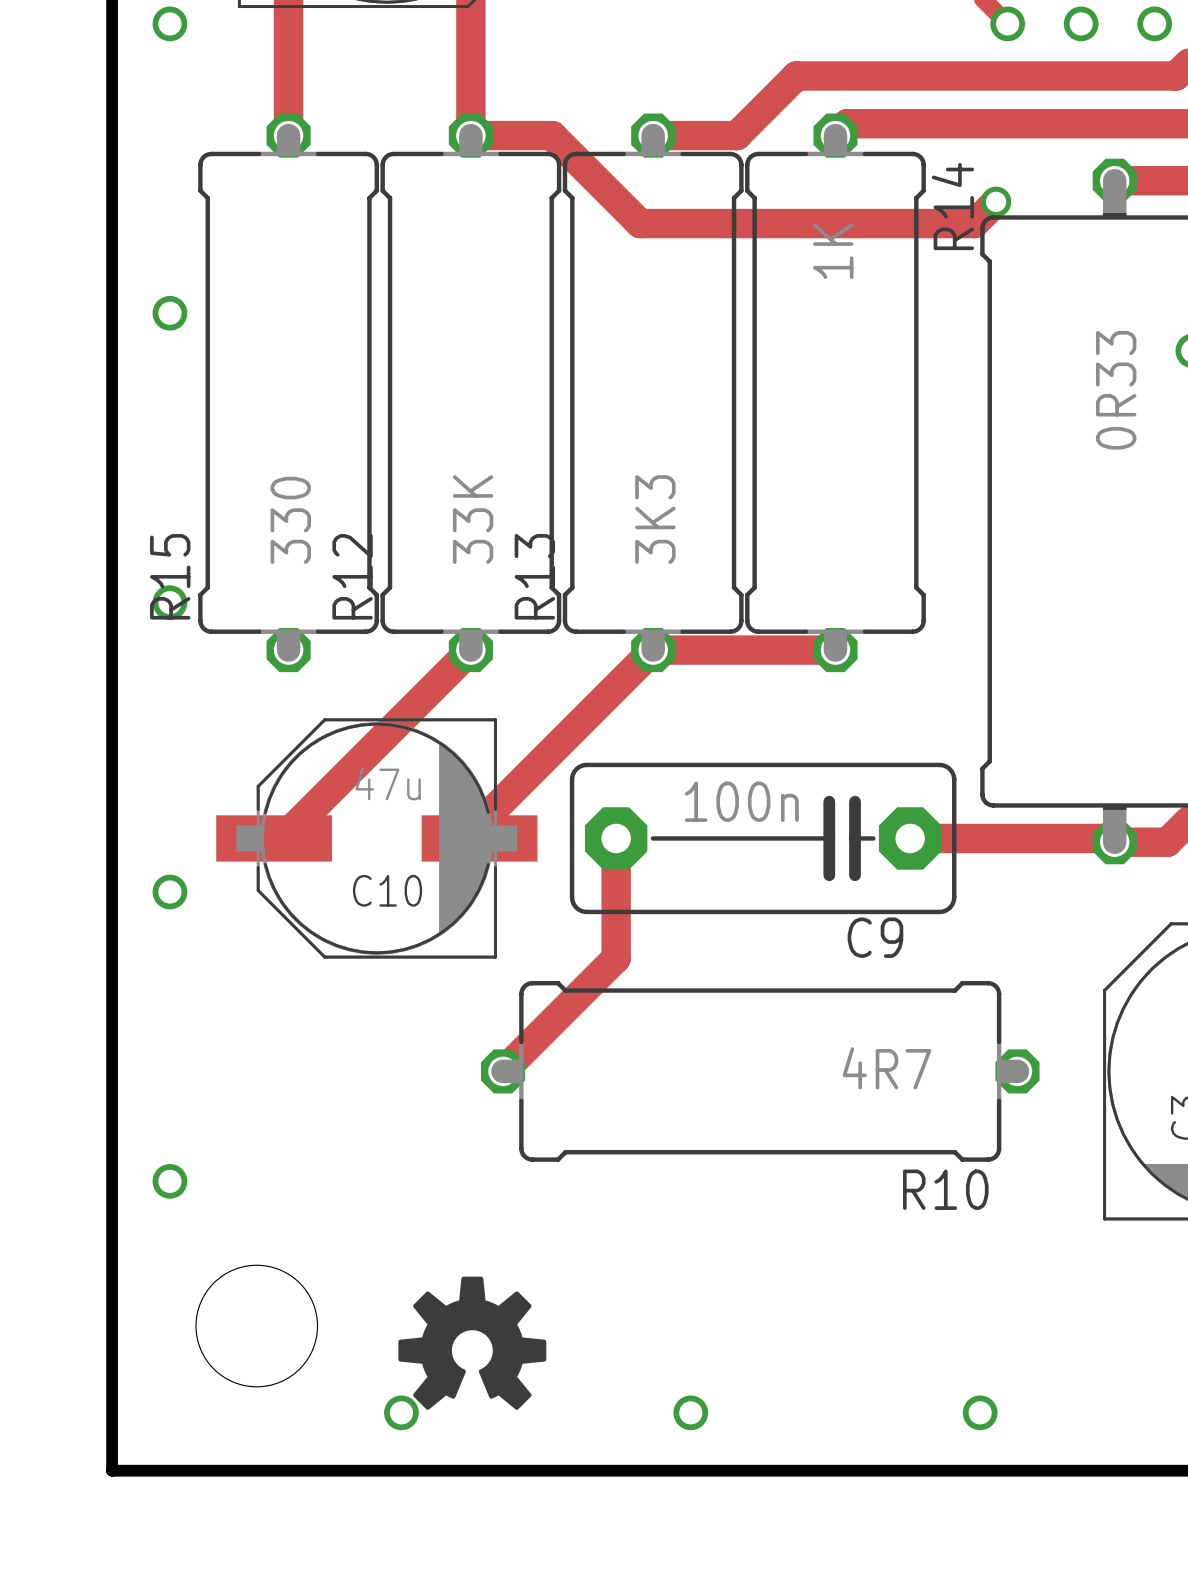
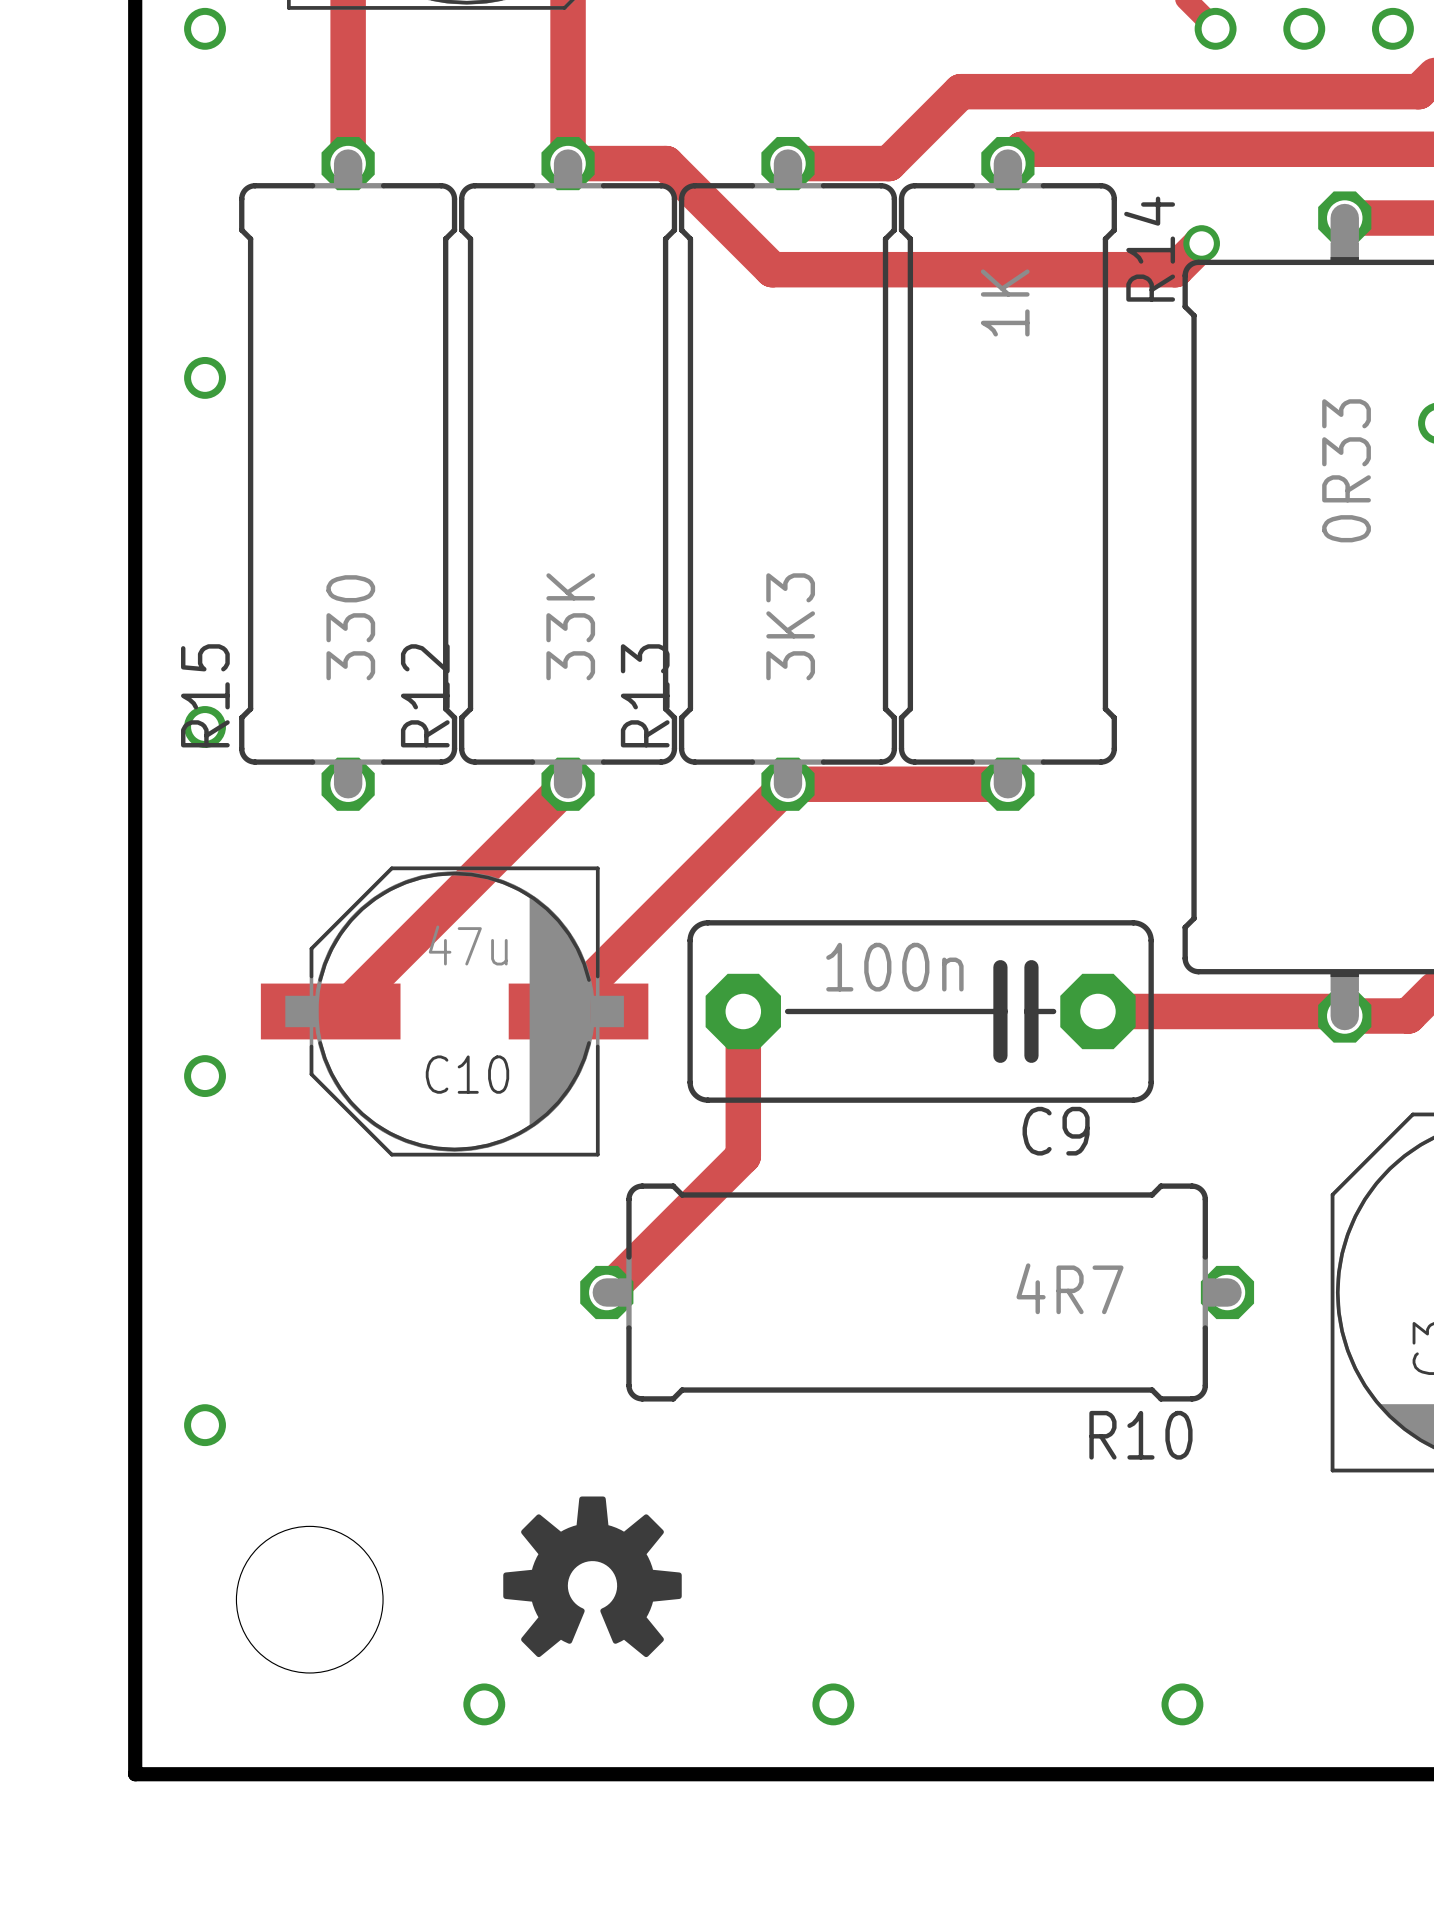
drawing position: (472, 1343) -> (592, 1576)

